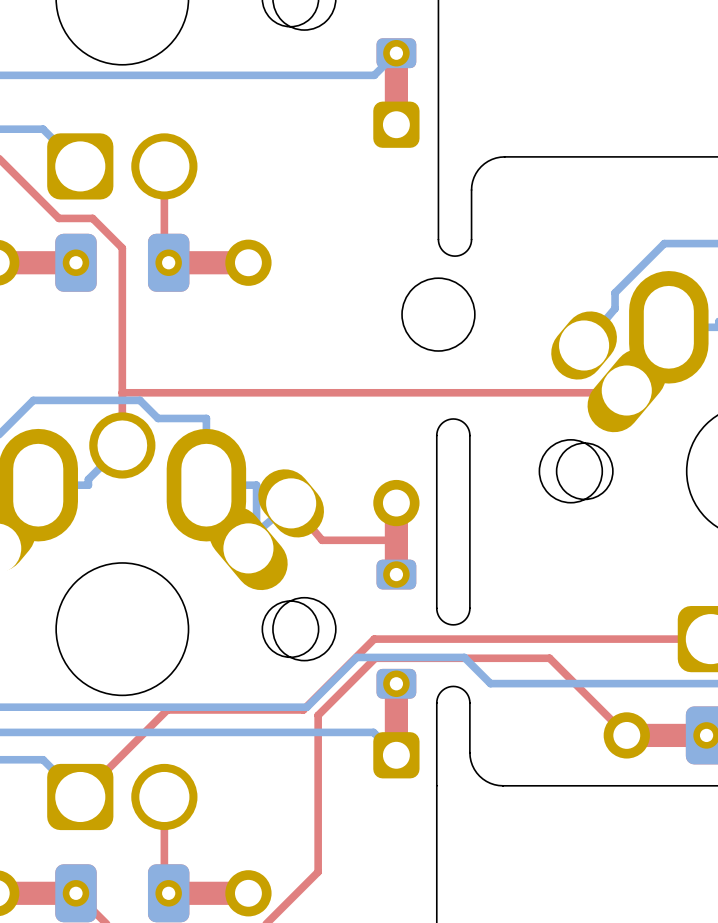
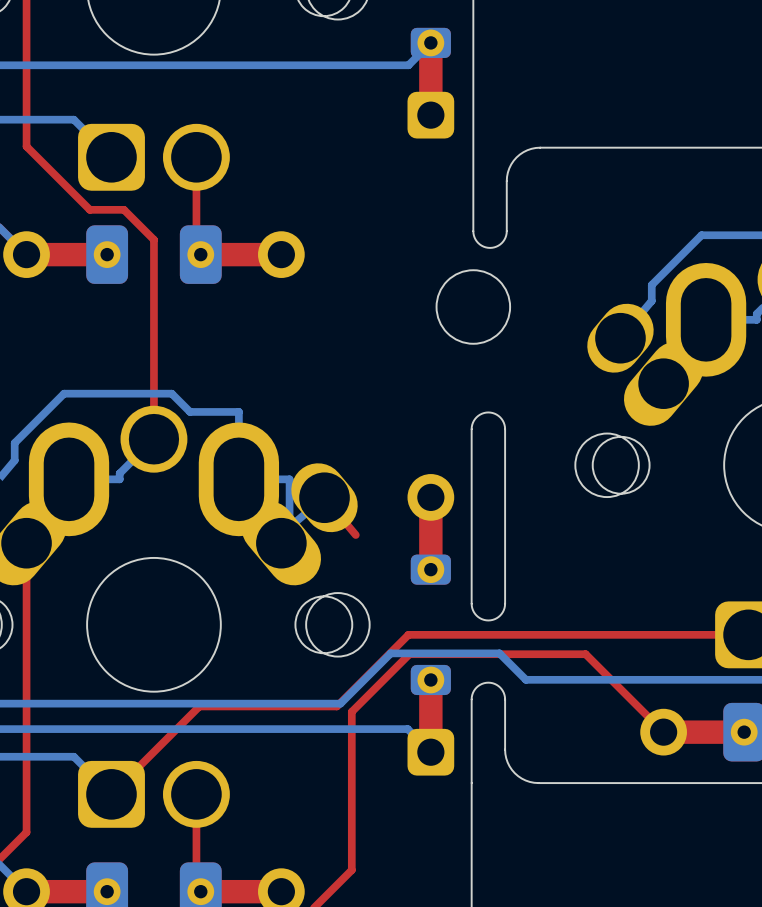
top track: (626, 390) (624, 392) (122, 392) -> none
top track: (396, 540) (322, 540) -> none

